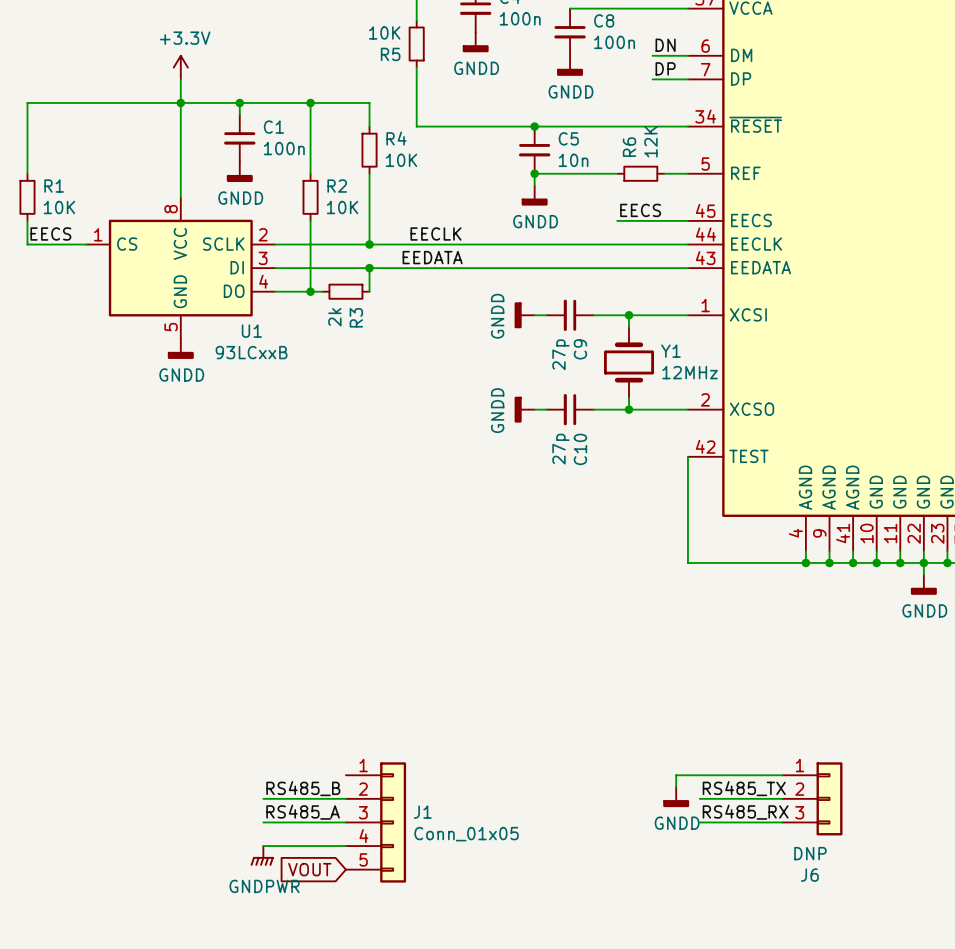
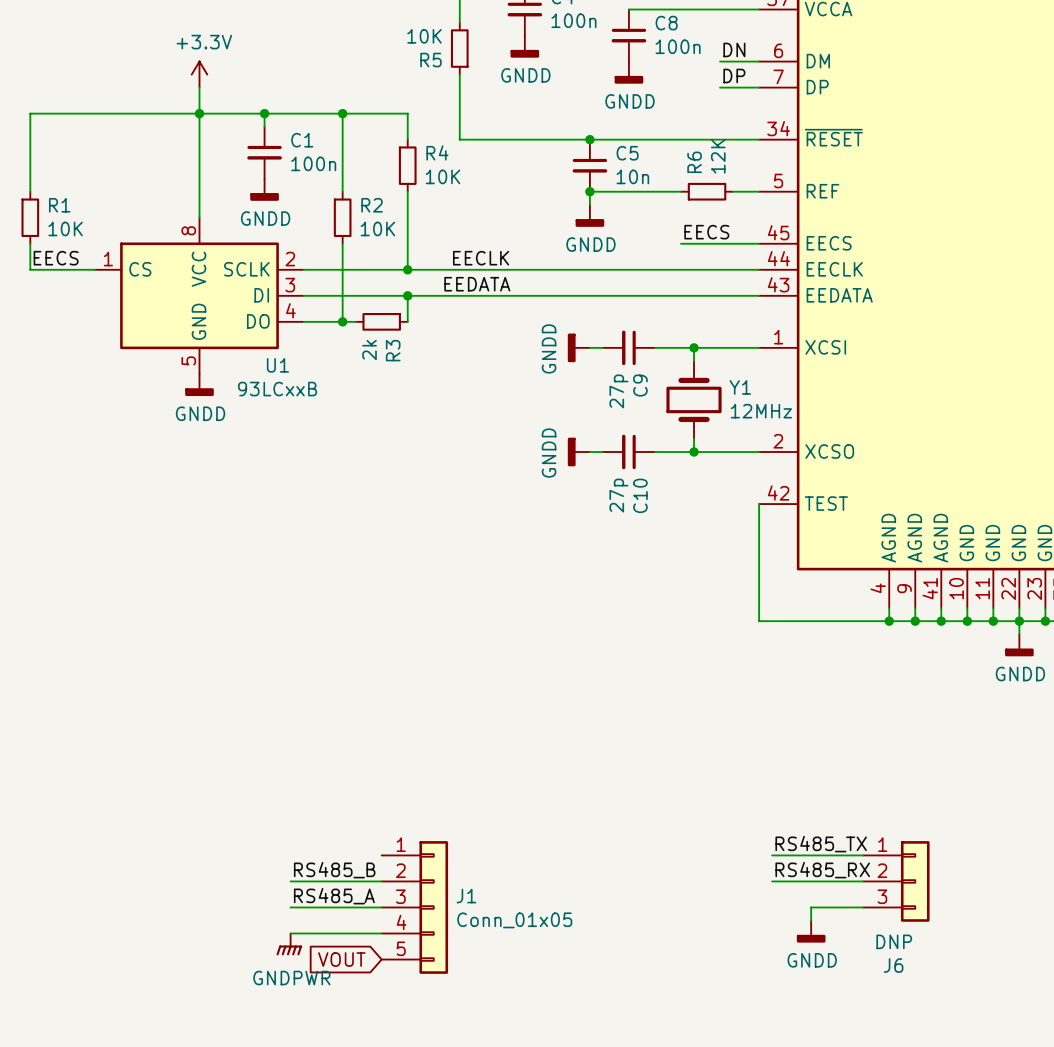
label: none -> RS485_TX (821, 844)
wire: (699, 775) (676, 775) (676, 787) -> none
label: RS485_TX (744, 788) -> RS485_RX (822, 870)
power symbol position: GNDD (676, 797) -> GNDD (811, 931)
label: RS485_RX (745, 812) -> none
wire: (699, 822) (735, 822) -> (811, 920) (811, 907)

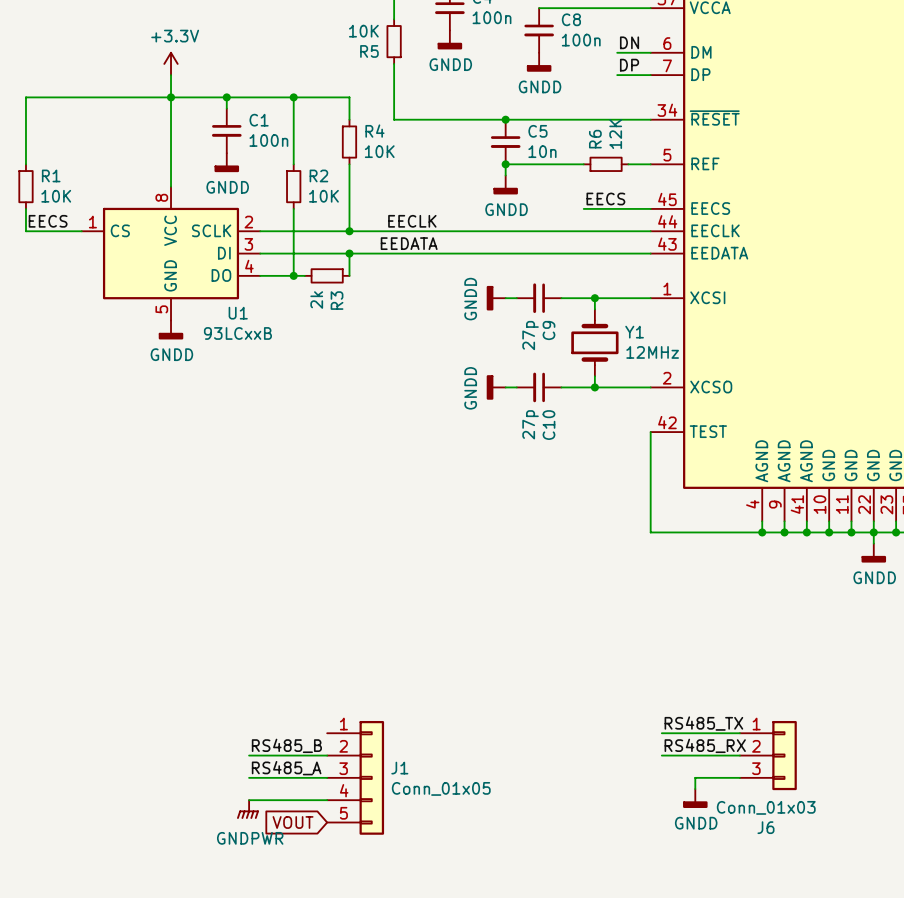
J6 value: DNP (894, 941) -> Conn_01x03 (766, 807)

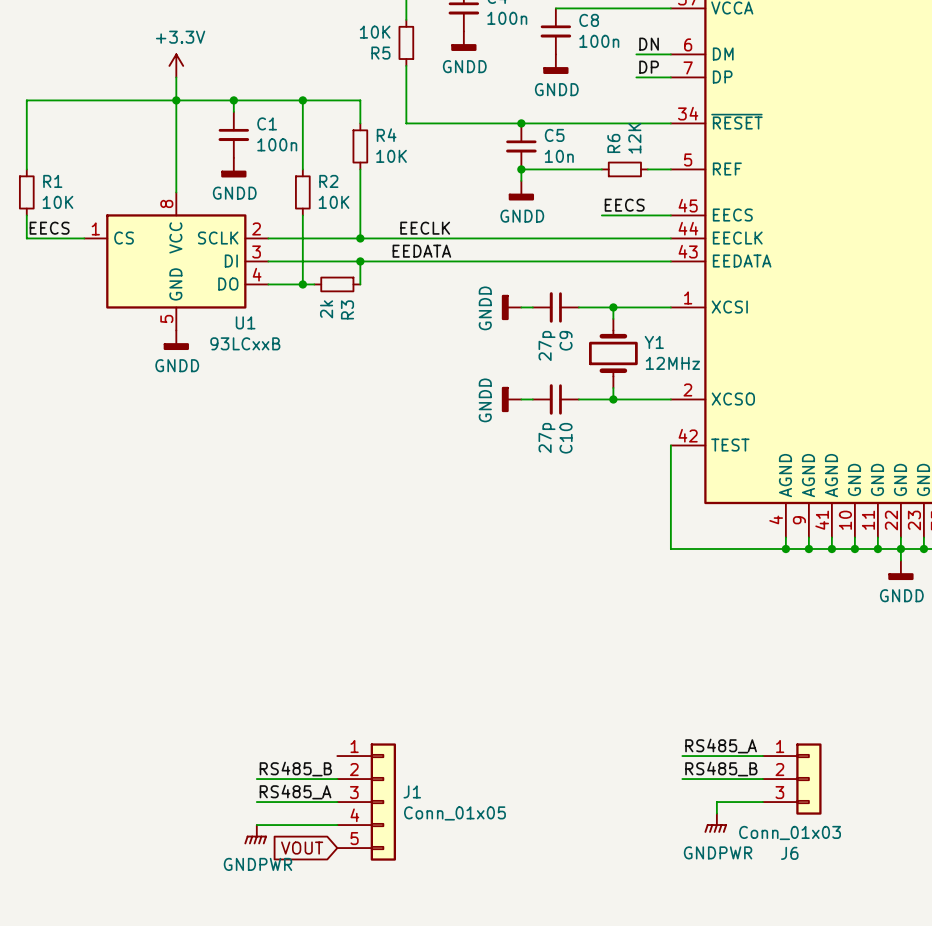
label: RS485_TX (703, 723) -> RS485_A (721, 746)
label: RS485_RX (705, 745) -> RS485_B (721, 769)
power symbol: GNDD (695, 798) -> GNDPWR (715, 823)

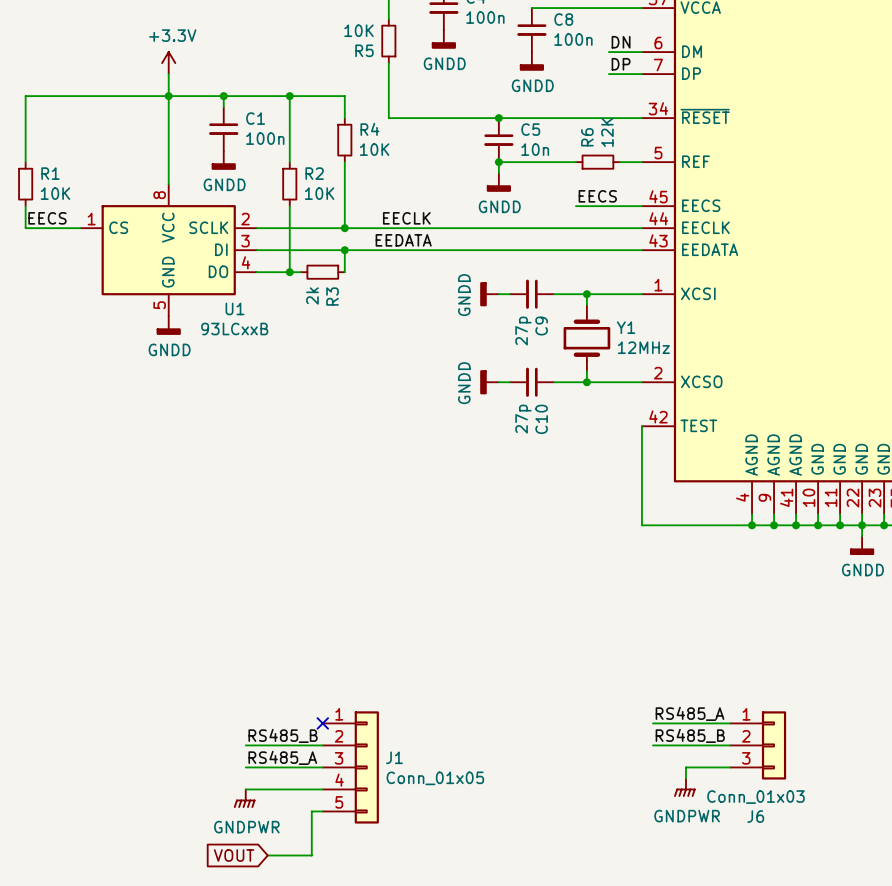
no-connect mark: none -> (322, 723)
global label position: VOUT (302, 848) -> VOUT (234, 855)
wire: none -> (322, 811) (311, 811) (311, 855) (267, 855)

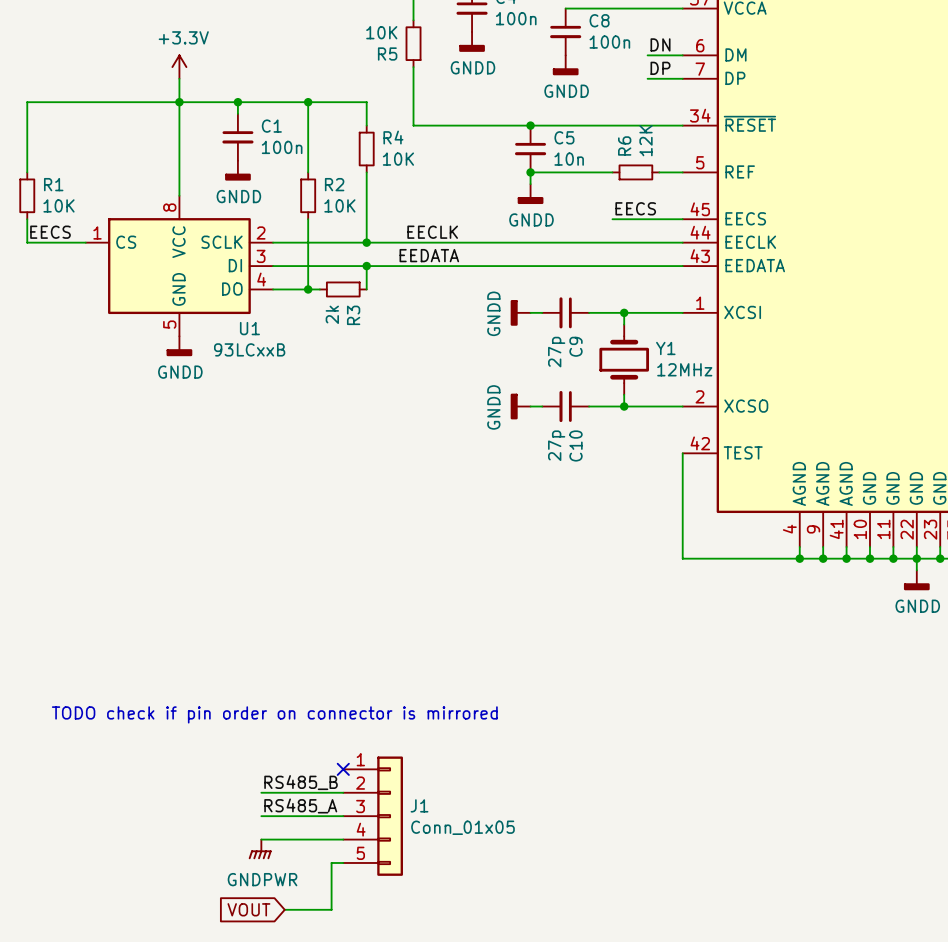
text: none -> TODO check if pin order on connector is mirrored (274, 714)
label: RS485_A (690, 713) -> none
wire: (652, 723) (730, 723) -> none
label: RS485_B (690, 735) -> none
wire: (652, 745) (730, 745) -> none
J6: Conn_01x03 (758, 745) -> none
wire: (730, 767) (685, 767) (685, 778) -> none
power symbol: GNDPWR (684, 787) -> none

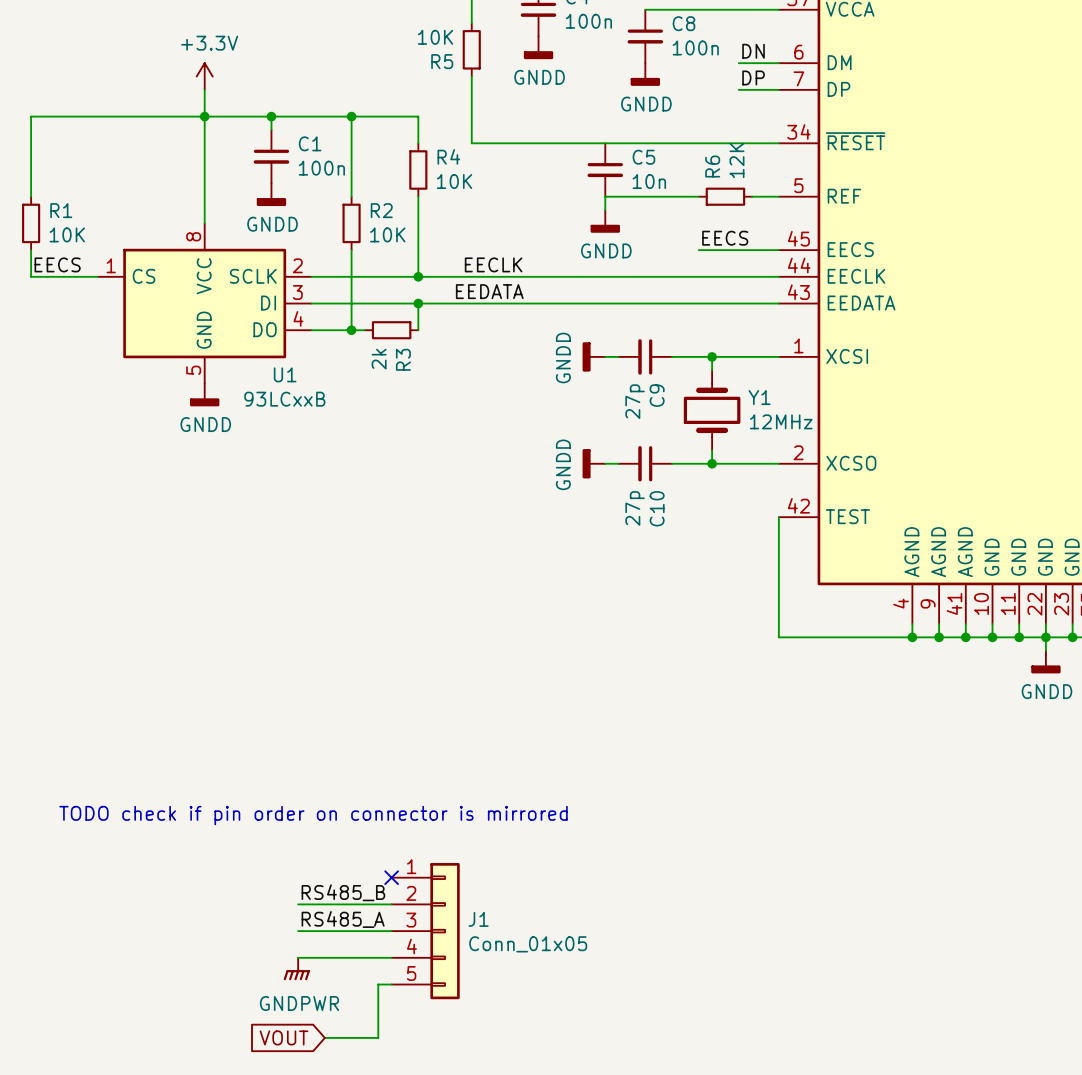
junction: (530, 125) -> none
junction: (530, 172) -> none

